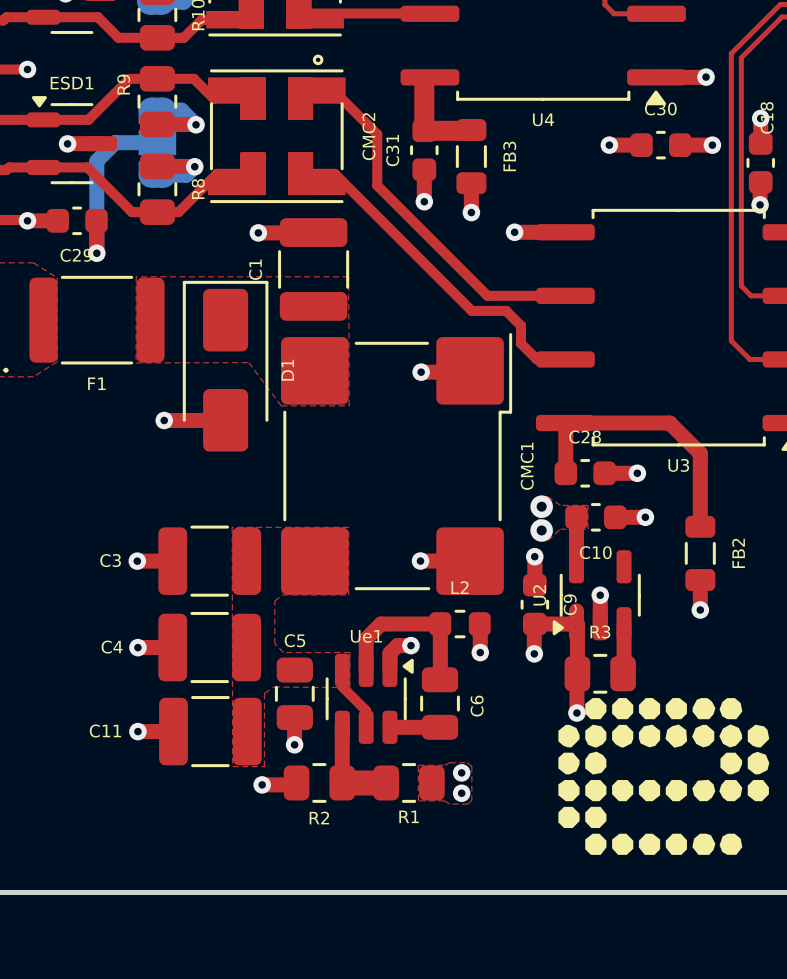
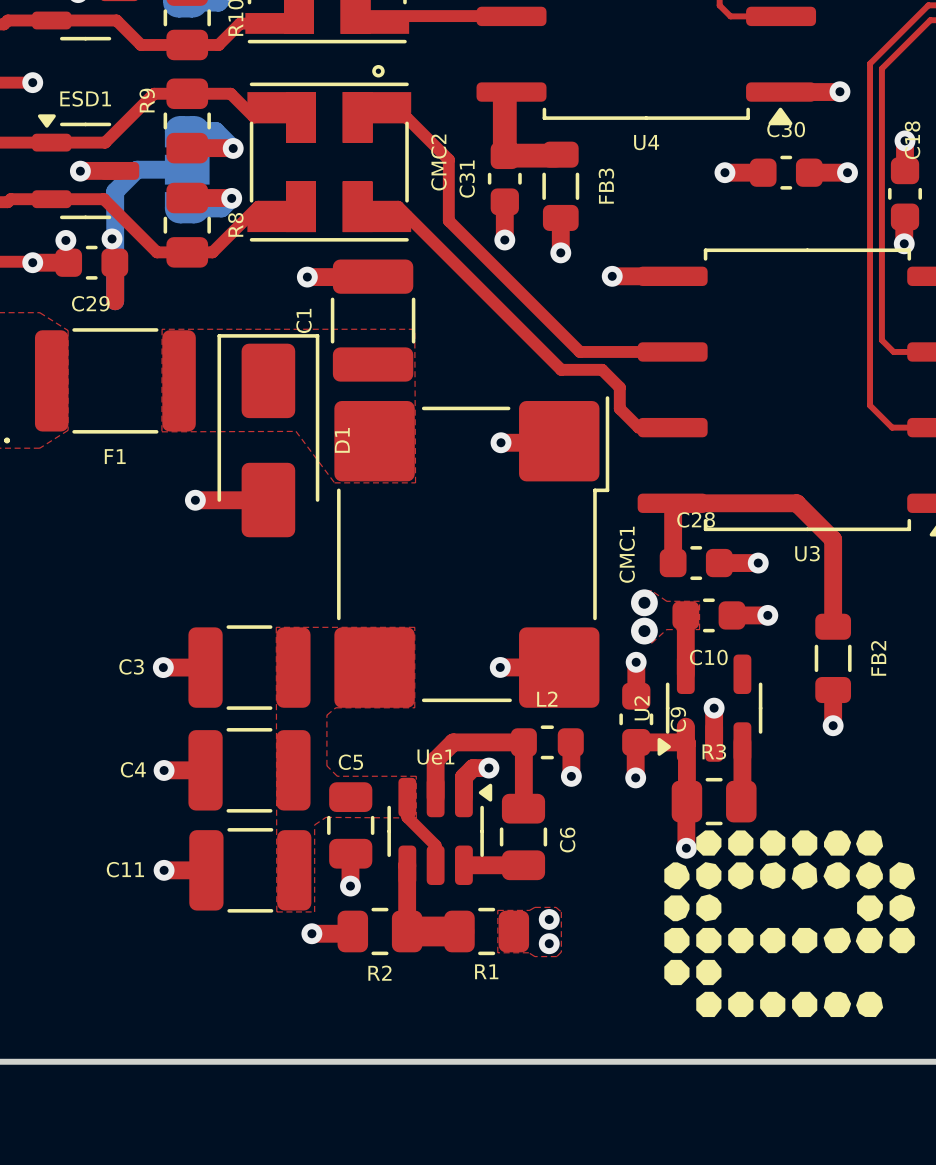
via: none -> (112, 238)
via: none -> (65, 240)
via: (96, 253) -> none

